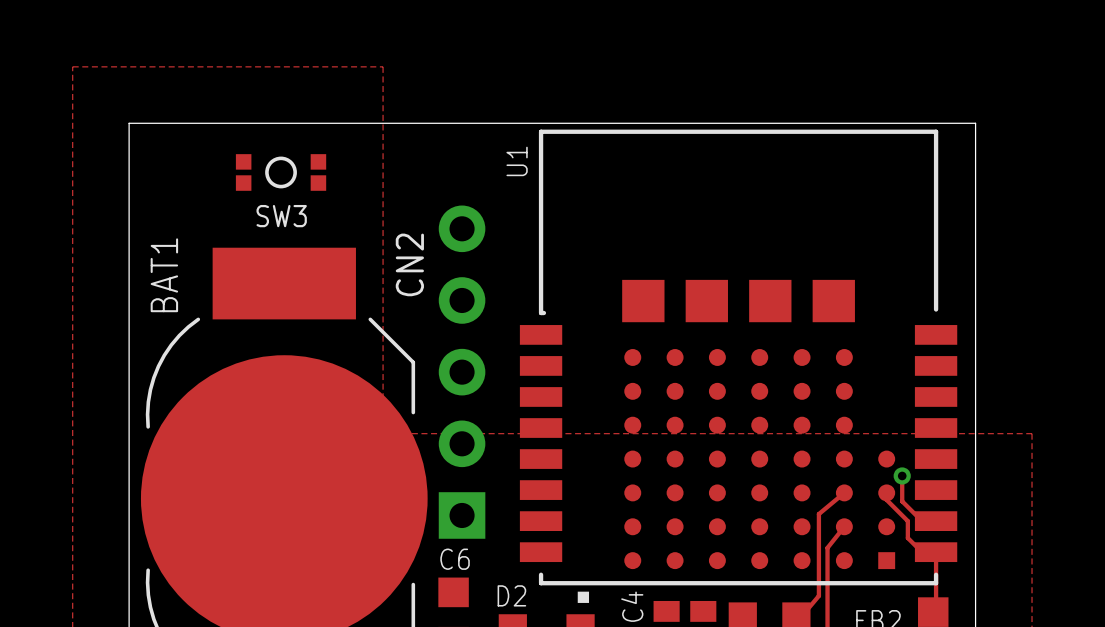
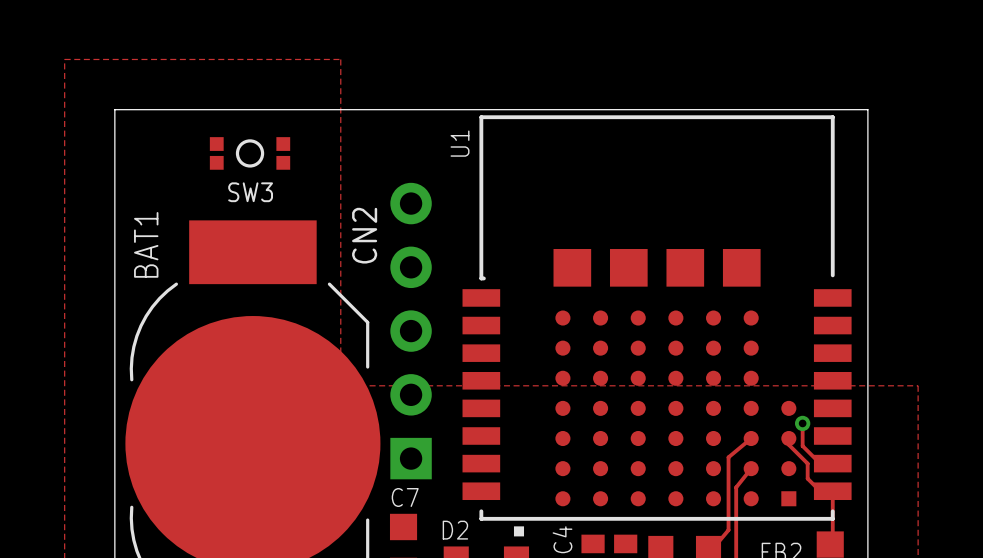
C6 name: C6 (455, 559) -> C7 (405, 497)

